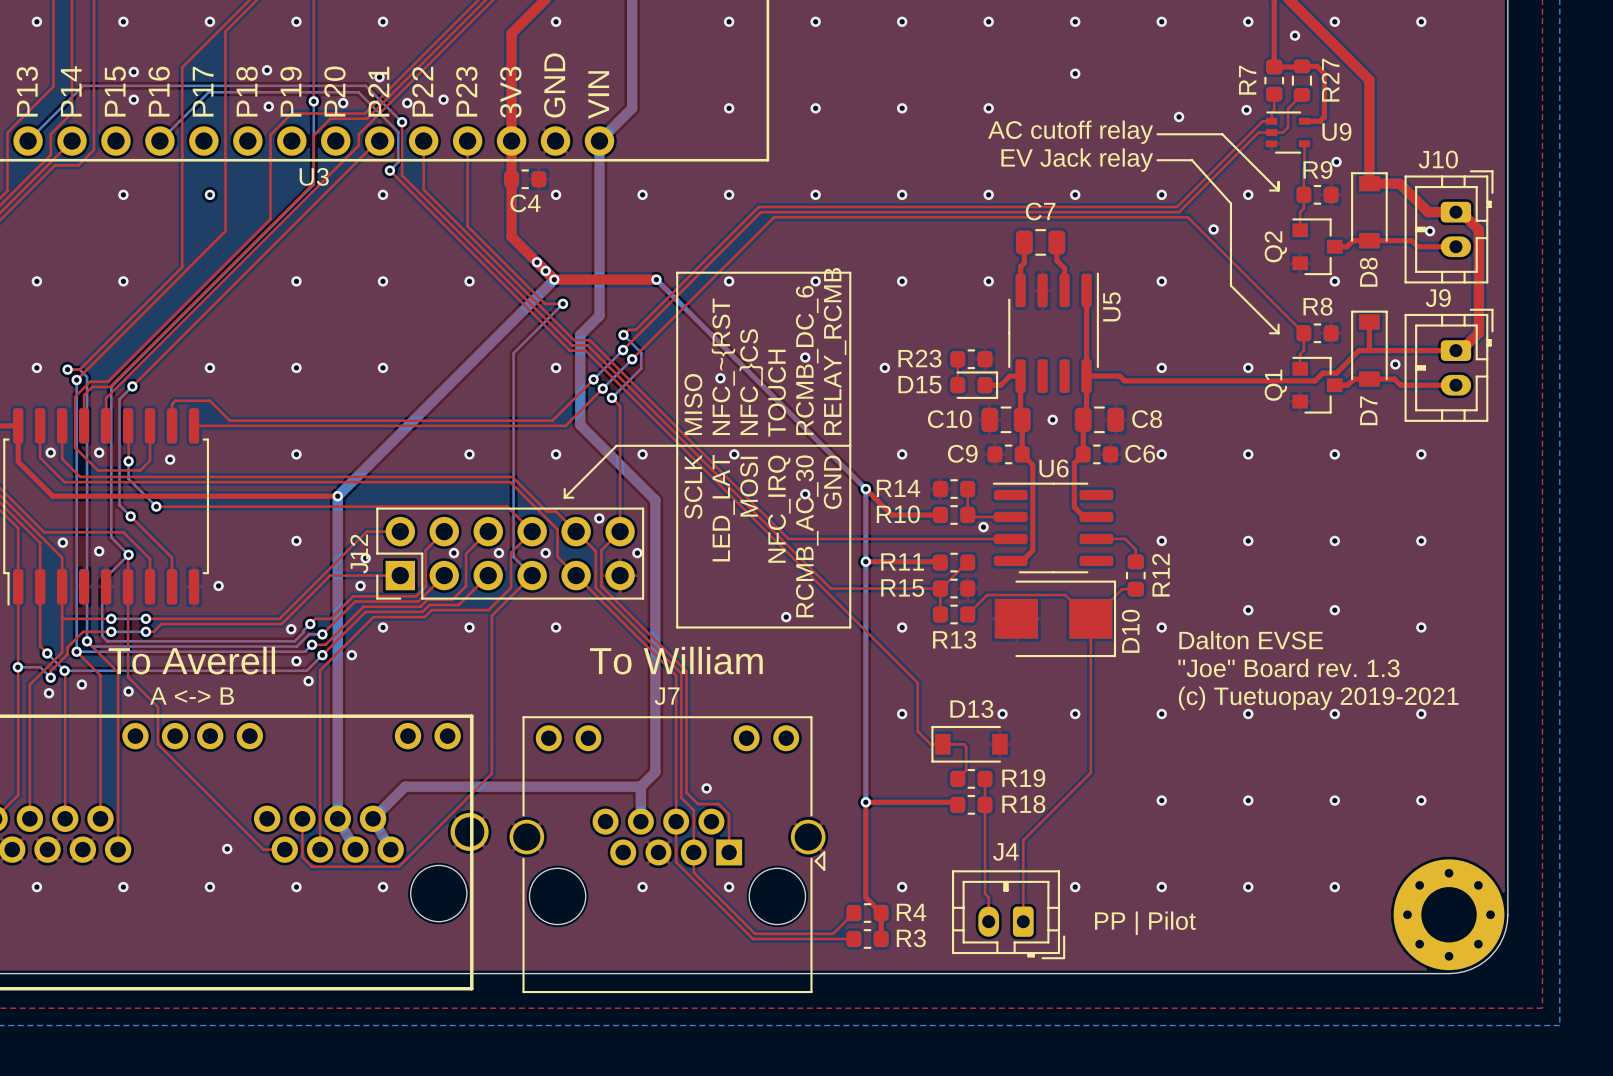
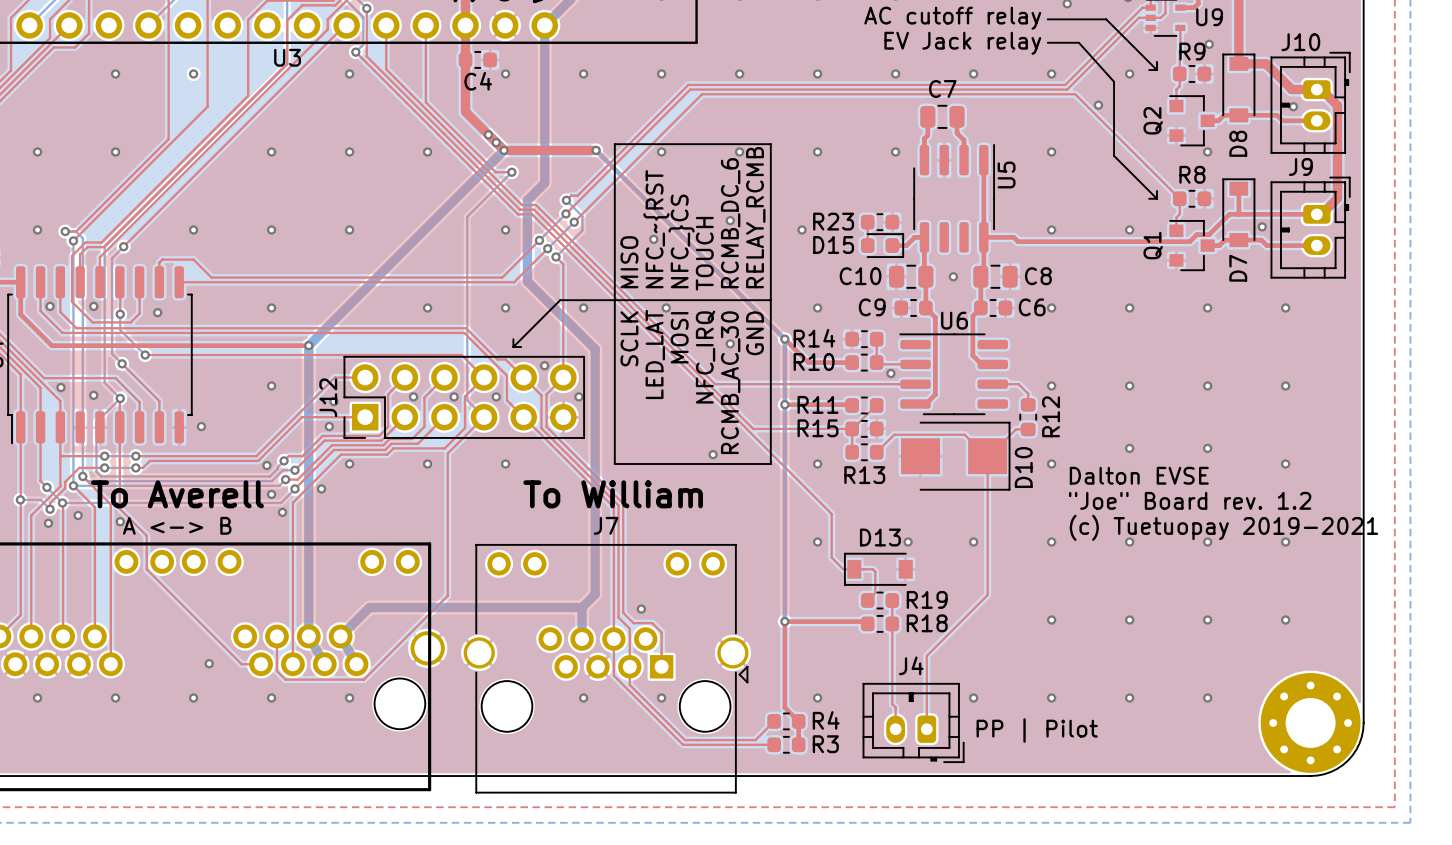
text: "Joe" Board rev. 1.3 (1289, 668) -> "Joe" Board rev. 1.2 (1190, 500)

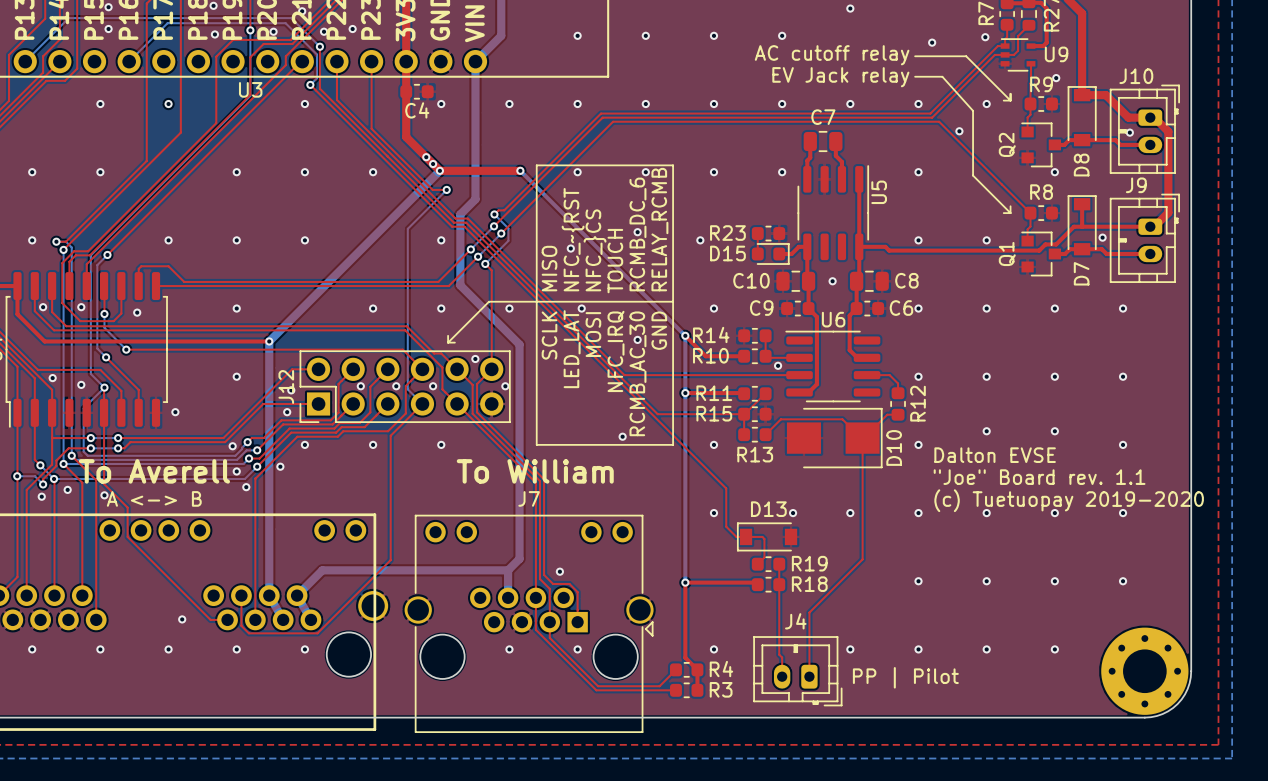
text: "Joe" Board rev. 1.2 (1190, 500) -> "Joe" Board rev. 1.1 (1039, 477)
text: (c) Tuetuopay 2019-2021 (1223, 527) -> (c) Tuetuopay 2019-2020 (1069, 500)

